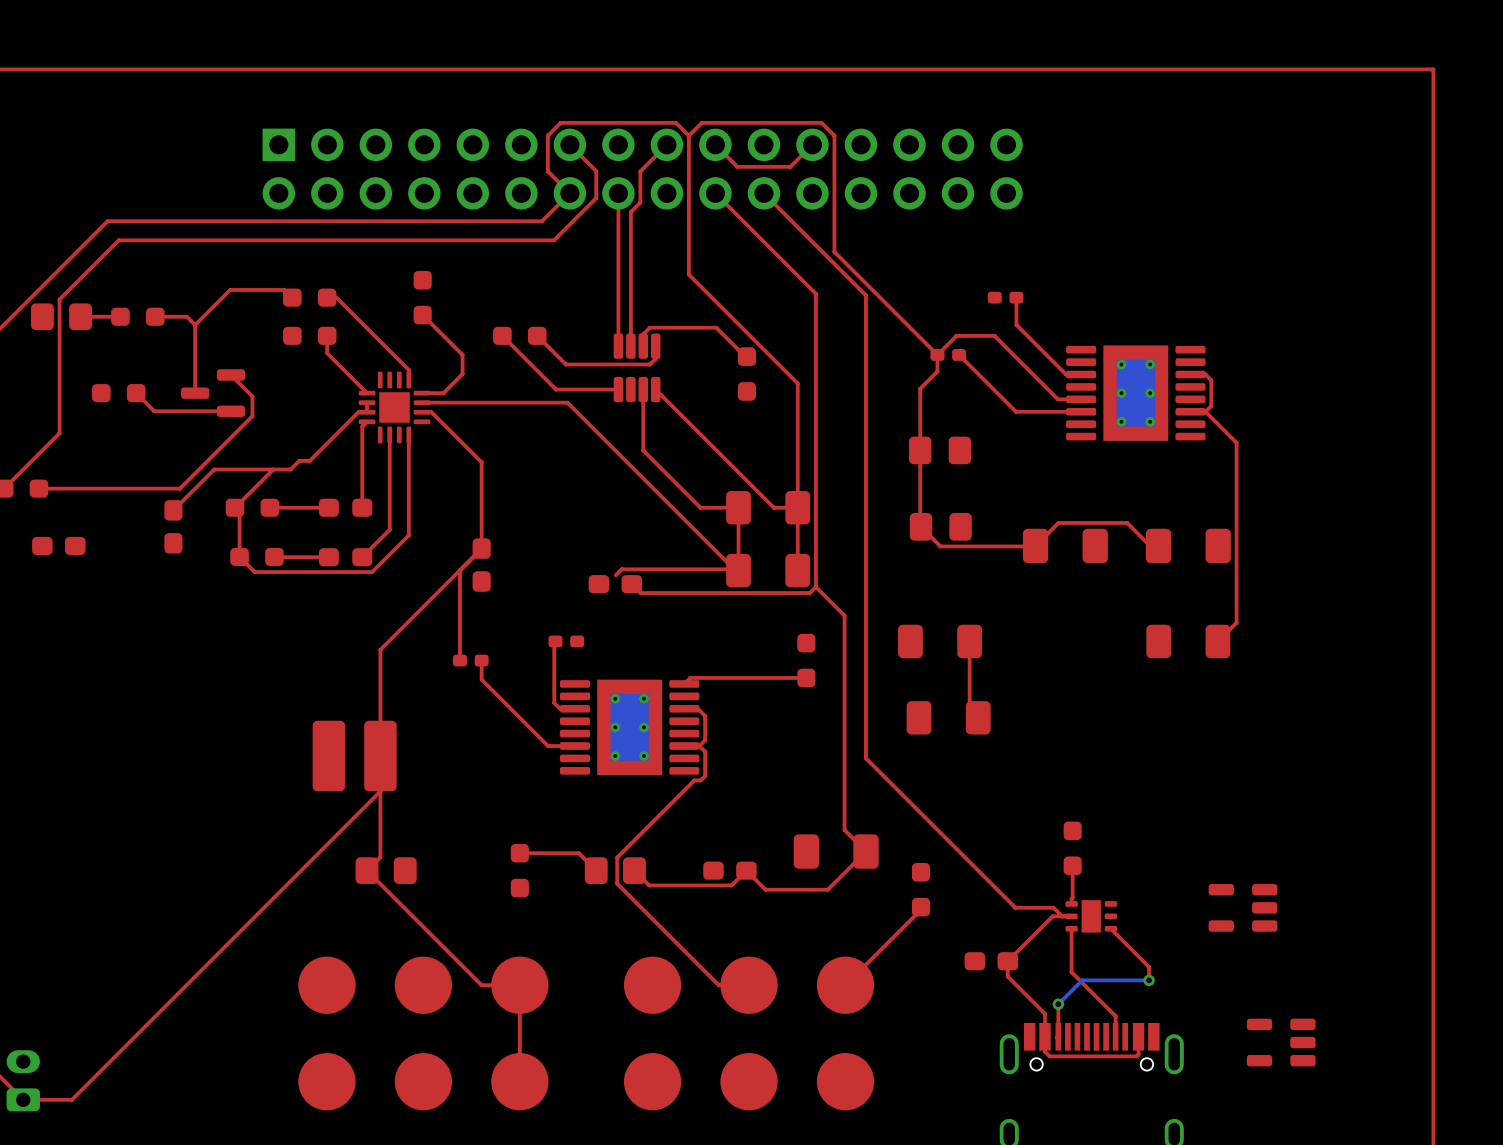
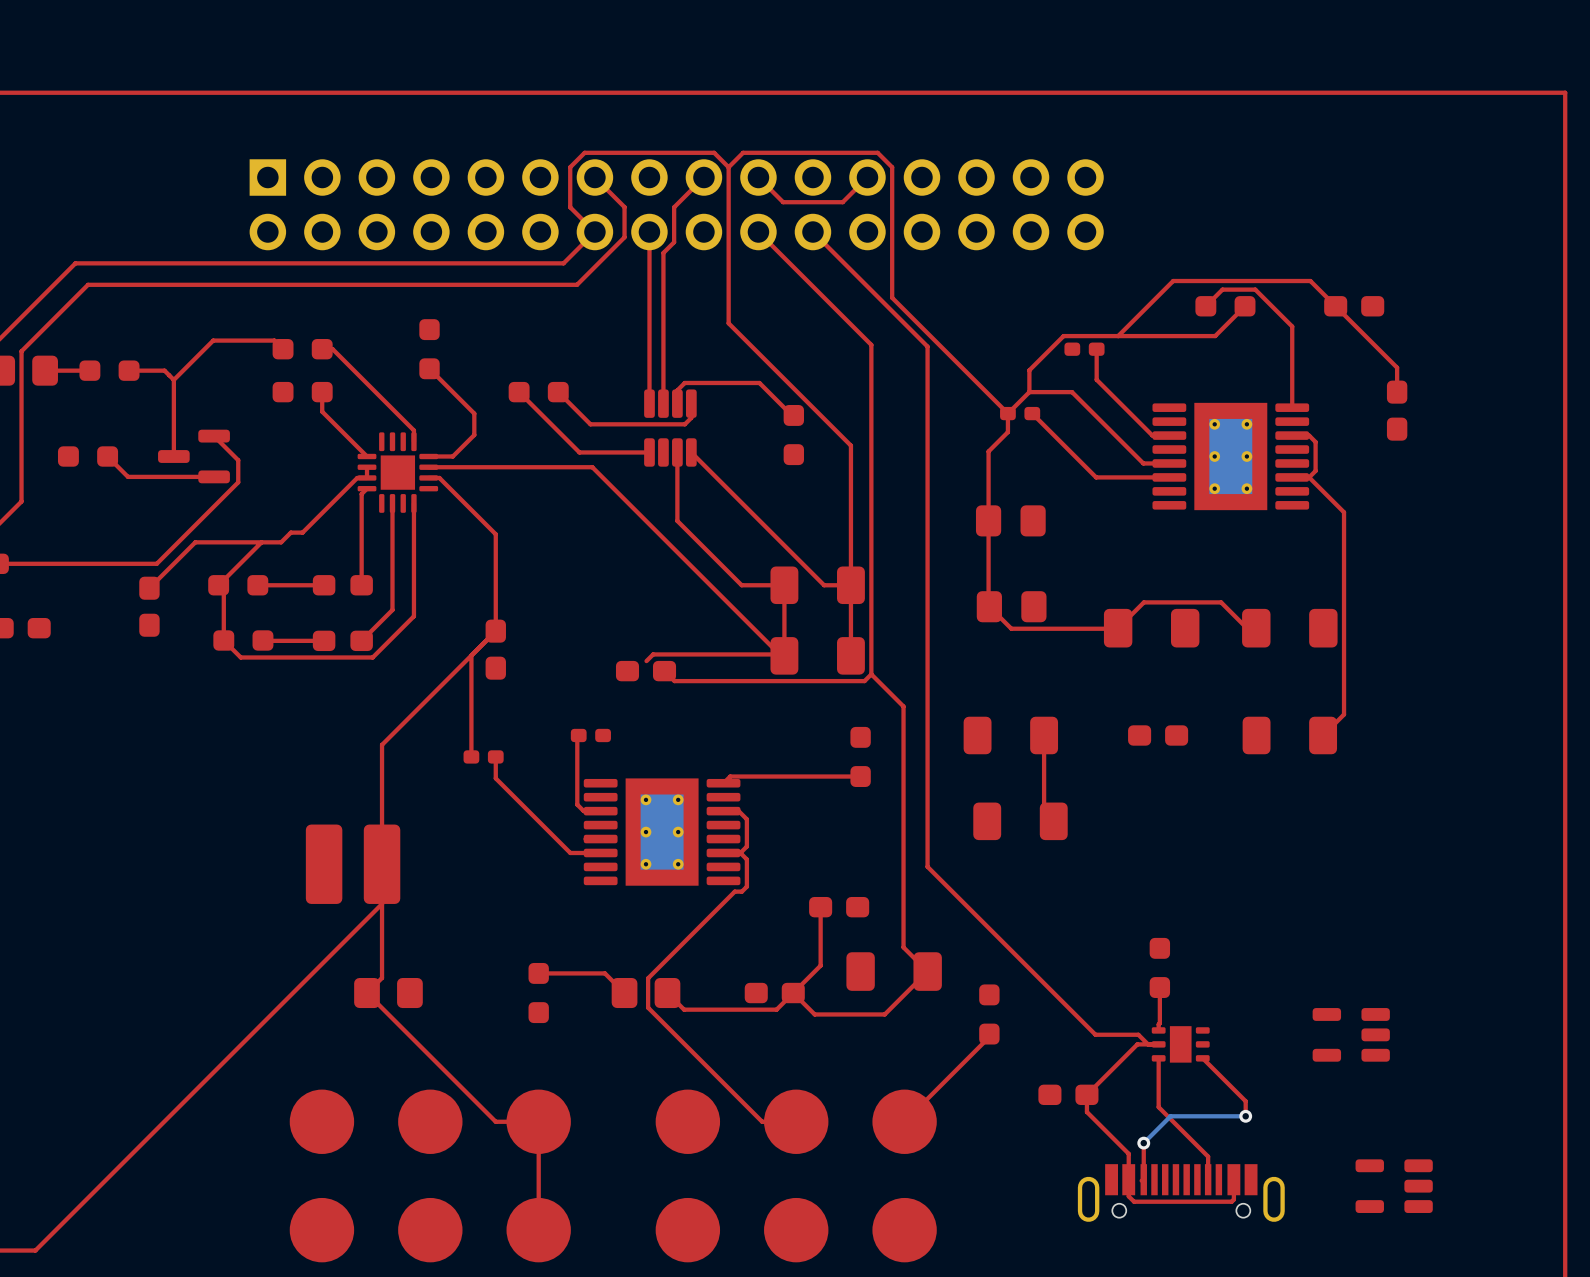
top track: none -> (1205, 306) (1222, 289) (1255, 289) (1292, 326) (1292, 407)
part: none -> (1225, 306)
top track: none -> (1245, 306) (1215, 336) (1063, 336) (1029, 370) (1029, 392)
part: none -> (1354, 306)
top track: none -> (1118, 336) (1173, 281) (1310, 281) (1397, 367) (1397, 392)
part: none -> (1397, 410)
part: none -> (1158, 735)
top track: none -> (820, 907) (820, 965) (793, 993)
part: none -> (839, 907)

